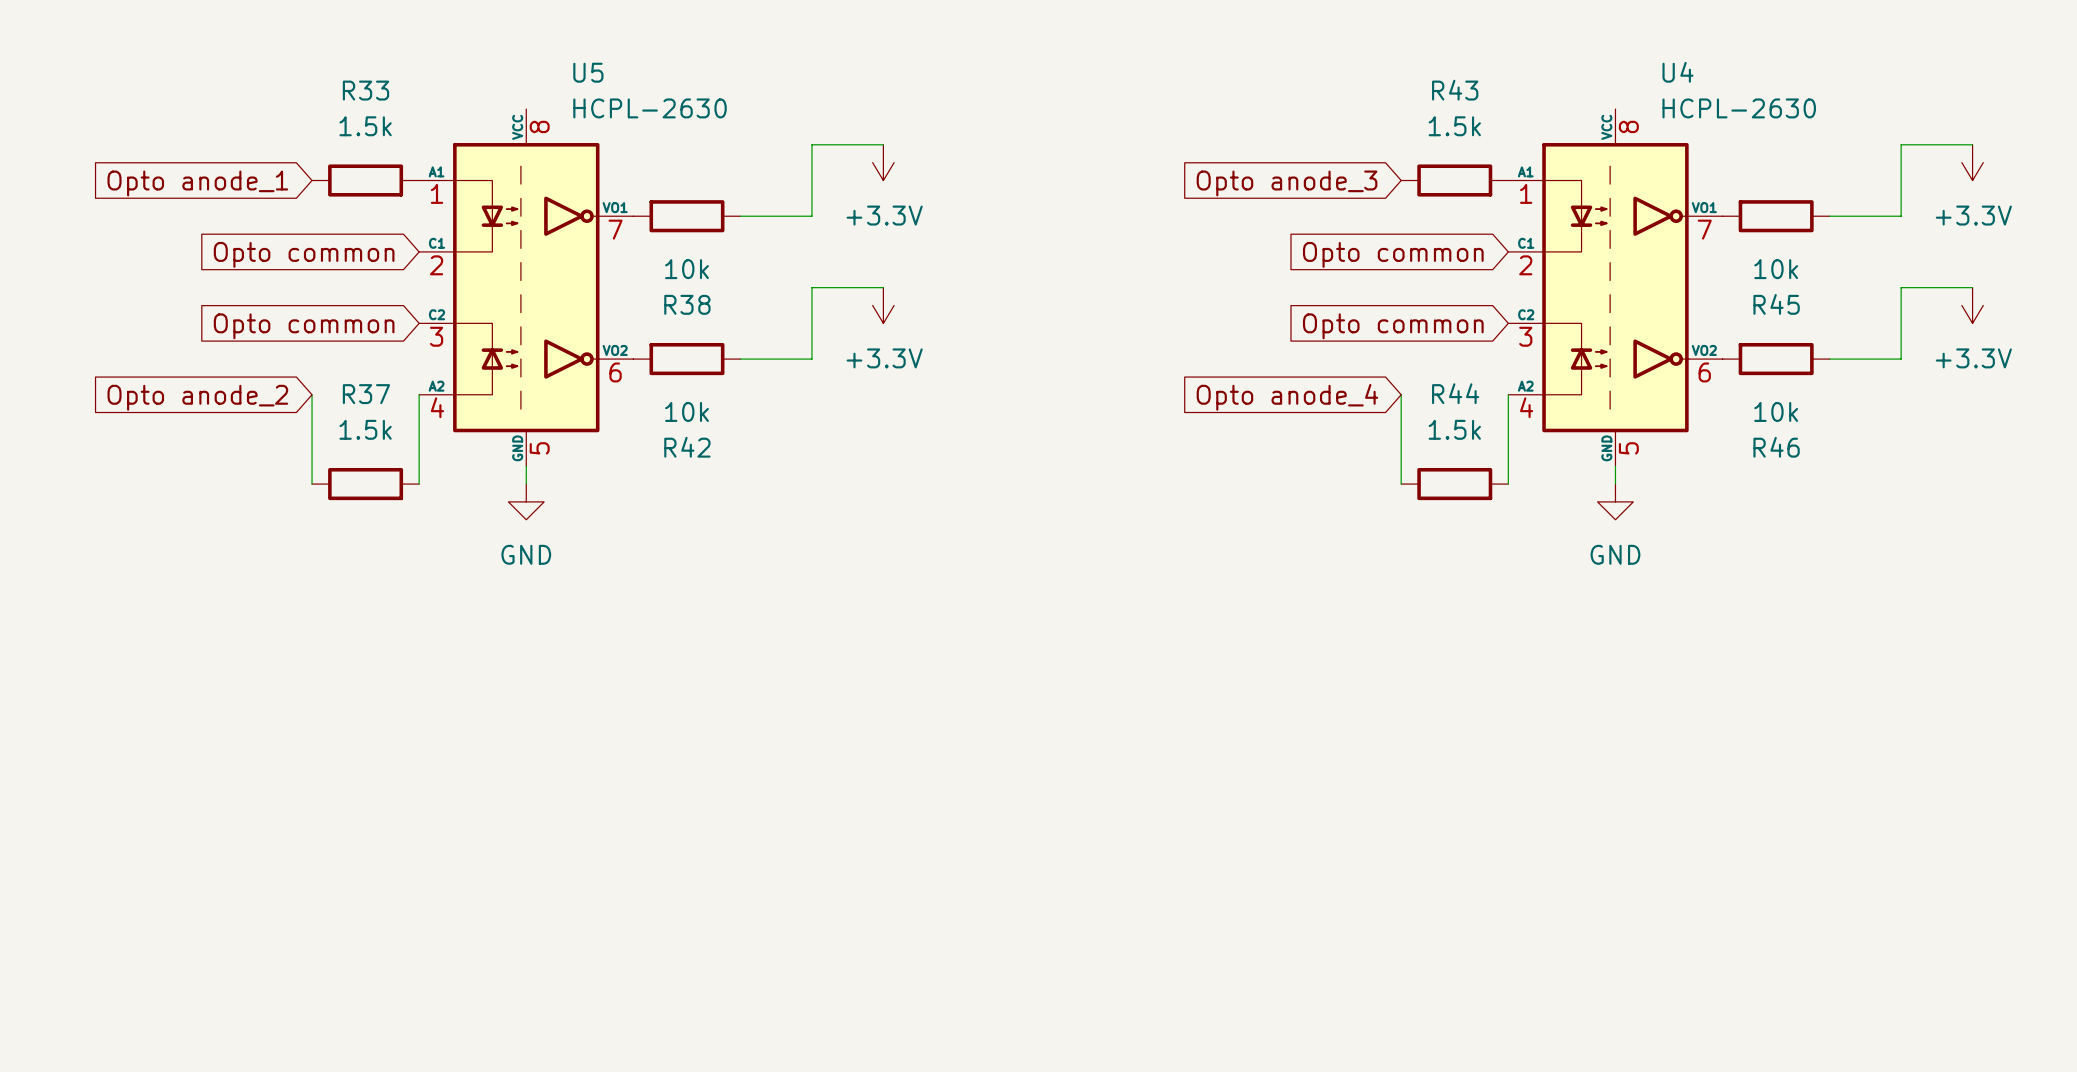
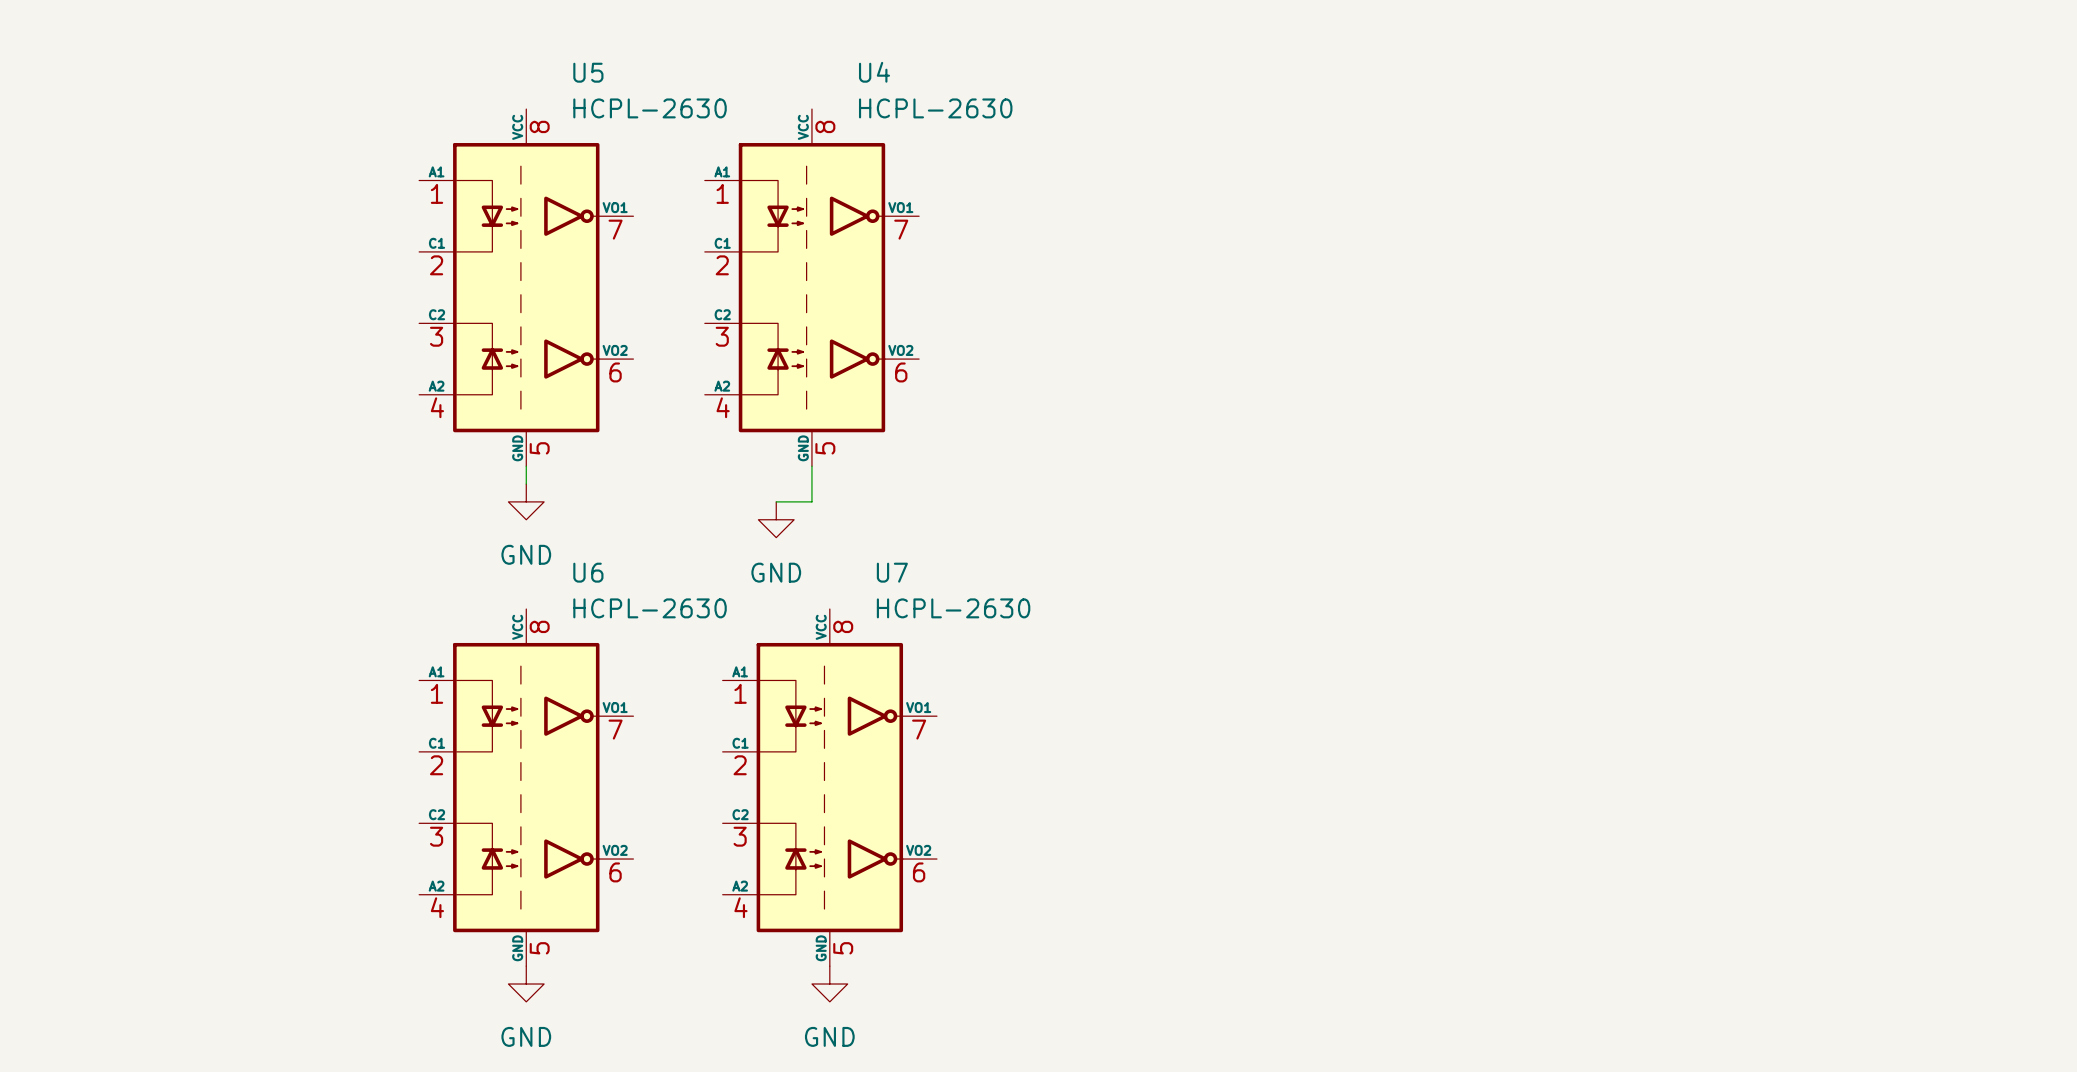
wire: (1972, 144) (1901, 144) (1901, 216) (1829, 216) -> none
power symbol: +3.3V (883, 162) -> none
power symbol: +3.3V (1972, 162) -> none
R33: 1.5k (365, 180) -> none
R43: 1.5k (1454, 180) -> none
global label: Opto anode_1 (197, 183) -> none
global label: Opto anode_3 (1287, 183) -> none
R38: 10k (686, 216) -> none
R45: 10k (1776, 216) -> none
global label: Opto common (304, 254) -> none
global label: Opto common (1393, 254) -> none
U4 position: (1615, 287) -> (811, 287)
wire: (1972, 287) (1901, 287) (1901, 359) (1829, 359) -> none
power symbol: +3.3V (883, 305) -> none
power symbol: +3.3V (1972, 305) -> none
global label: Opto common (304, 326) -> none
global label: Opto common (1393, 326) -> none
R42: 10k (686, 359) -> none
R46: 10k (1776, 359) -> none
wire: (312, 394) (312, 484) -> none
wire: (419, 394) (419, 484) -> none
wire: (1401, 394) (1401, 484) -> none
wire: (1508, 394) (1508, 484) -> none
global label: Opto anode_2 (197, 397) -> none
global label: Opto anode_4 (1287, 397) -> none
wire: none -> (811, 466) (811, 501) (776, 501)
wire: (1615, 466) (1615, 484) -> none
R37: 1.5k (365, 484) -> none
R44: 1.5k (1454, 484) -> none
power symbol: GND (1615, 501) -> none
power symbol: none -> GND (776, 519)
U6: none -> HCPL-2630 (526, 787)
U7: none -> HCPL-2630 (829, 787)
power symbol: none -> GND (526, 984)
power symbol: none -> GND (829, 984)

